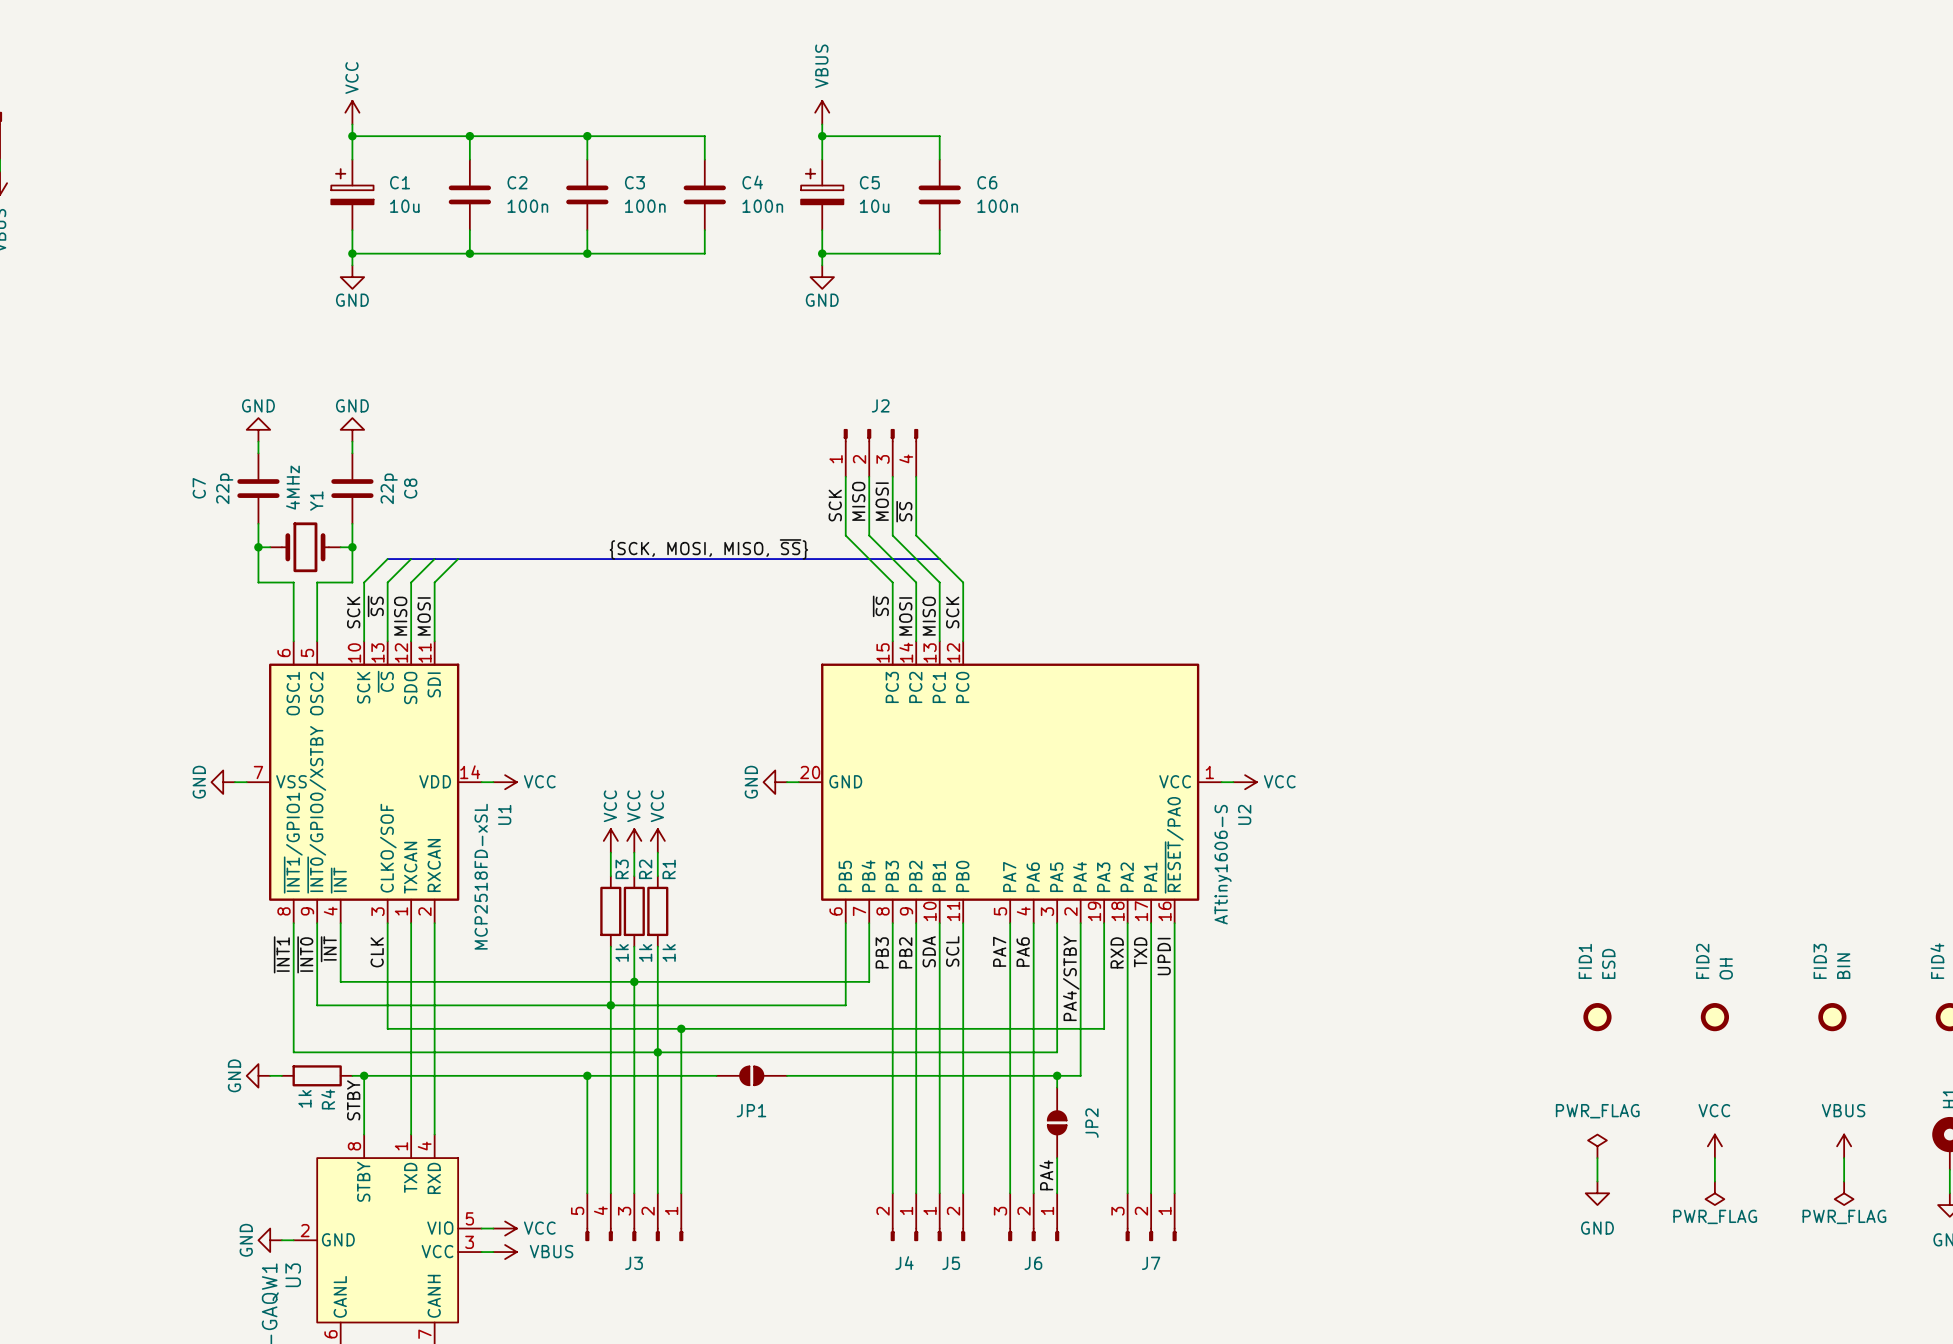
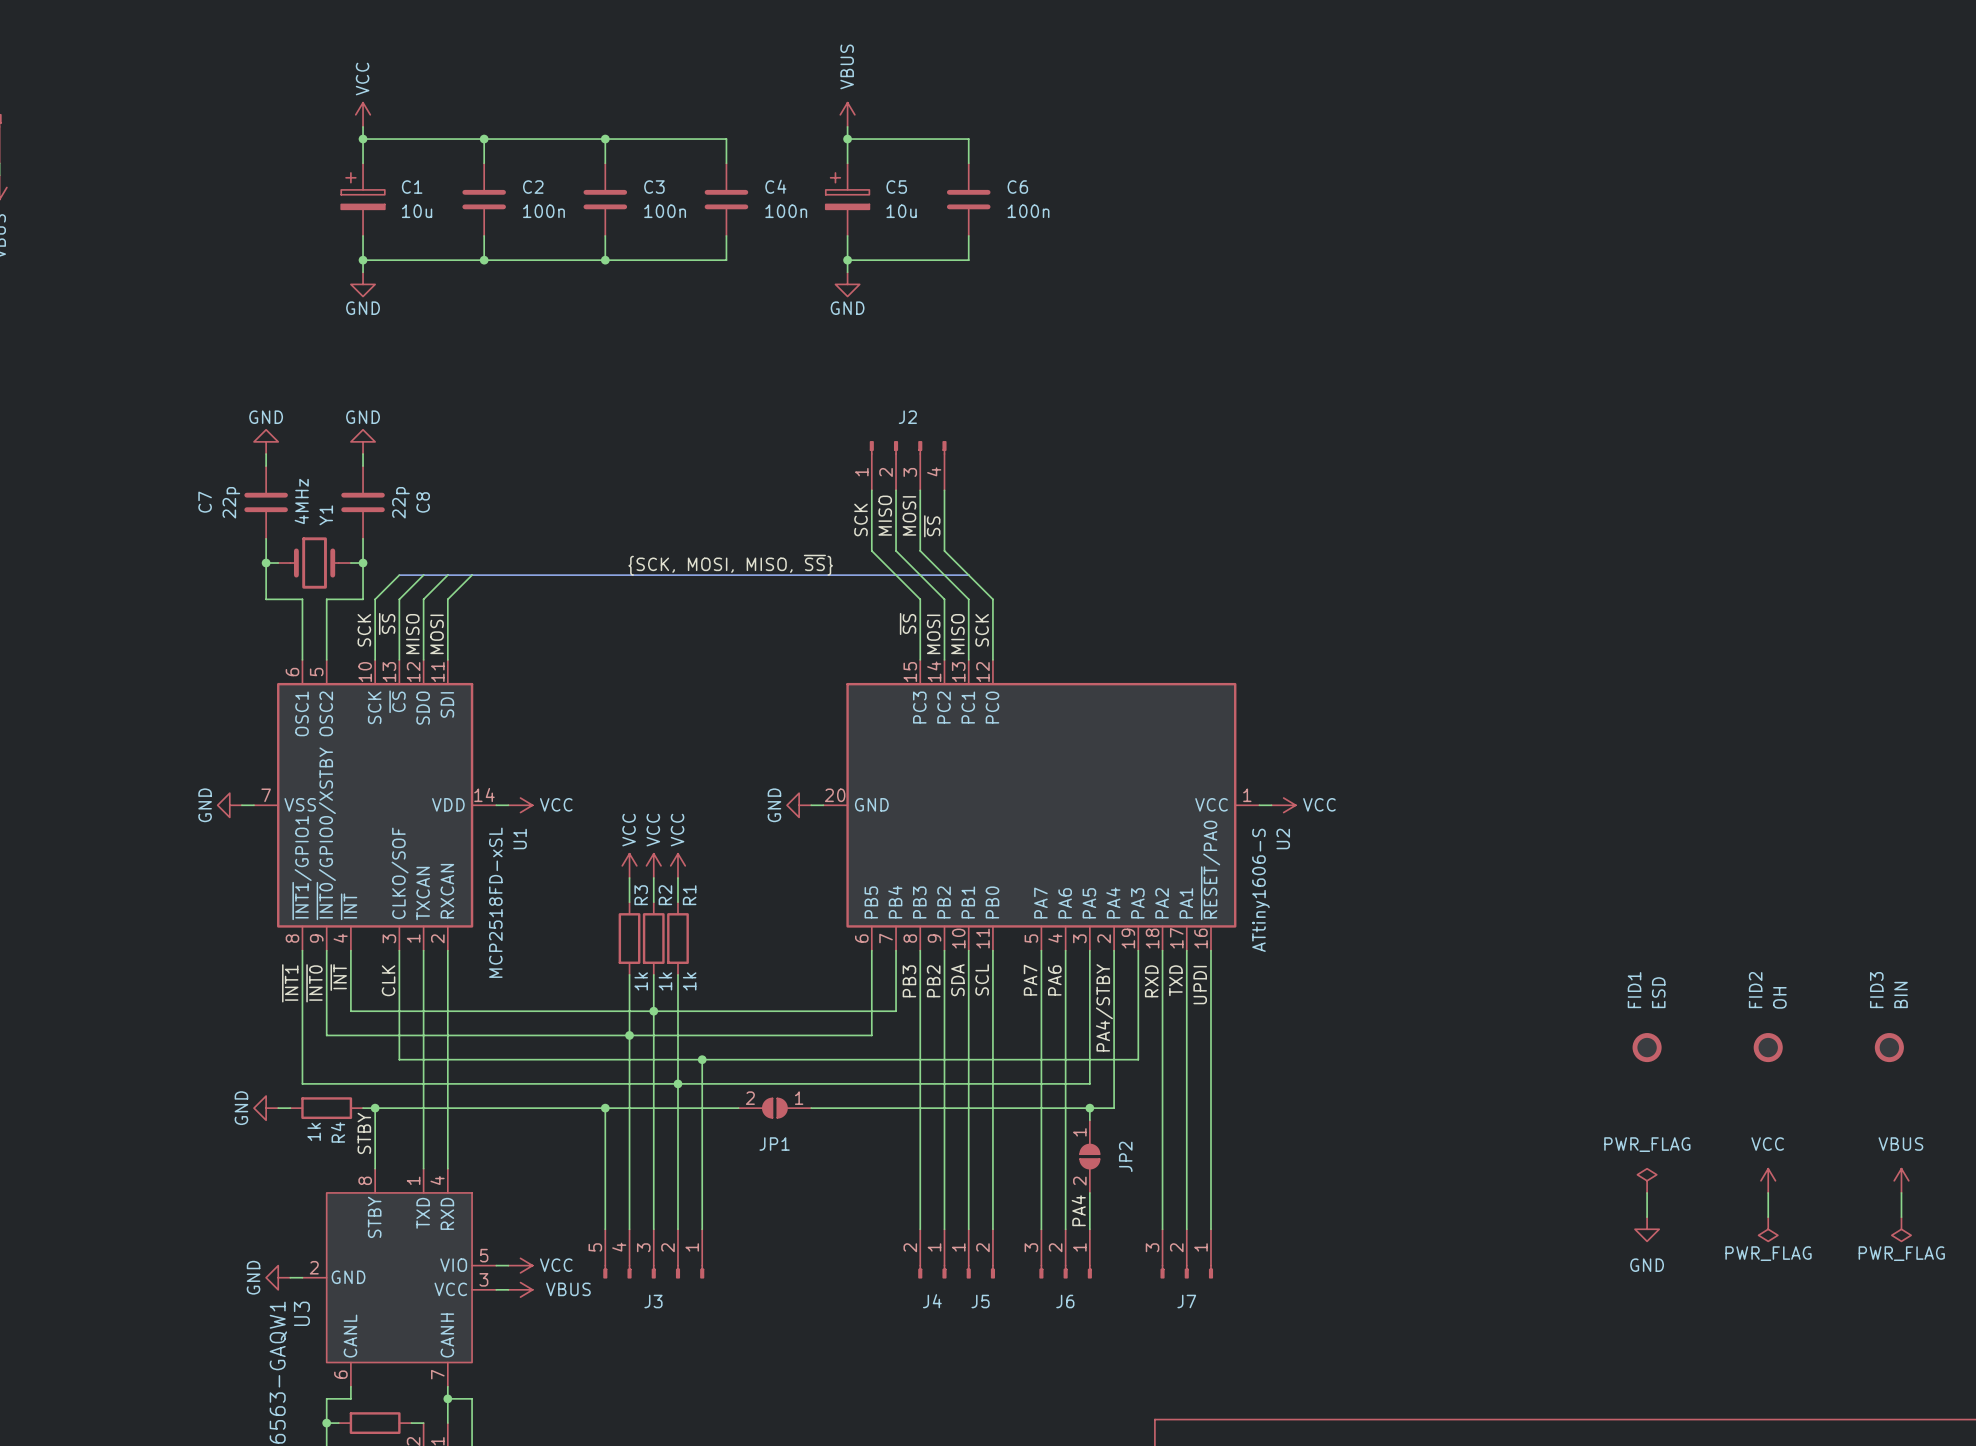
JP1 pin number: none -> 2 (750, 1098)
JP1 pin number: none -> 1 (799, 1098)
JP2 pin number: none -> 1 (1079, 1132)
JP2 pin number: none -> 2 (1079, 1181)

